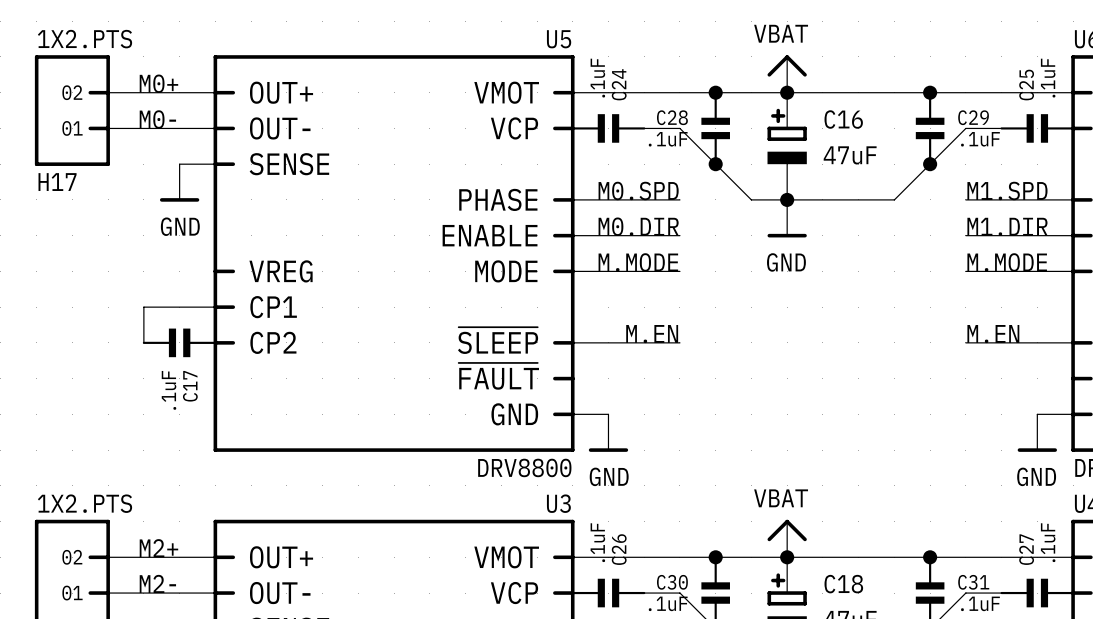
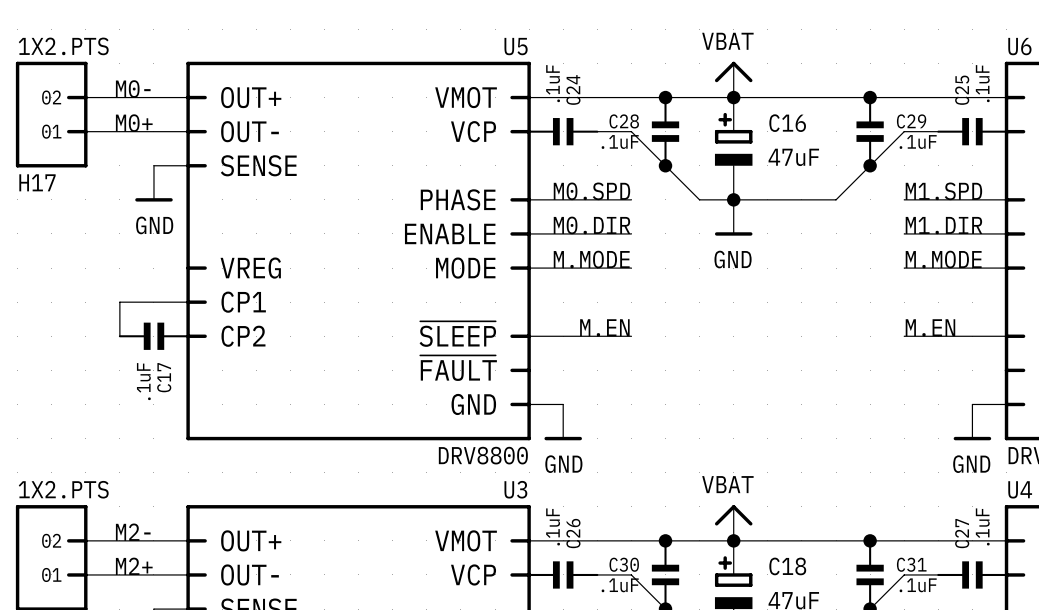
label: M0+ (158, 83) -> M0- (133, 89)
label: M0- (157, 119) -> M0+ (134, 123)
label: M2+ (158, 548) -> M2- (133, 532)
label: M2- (157, 583) -> M2+ (134, 566)

